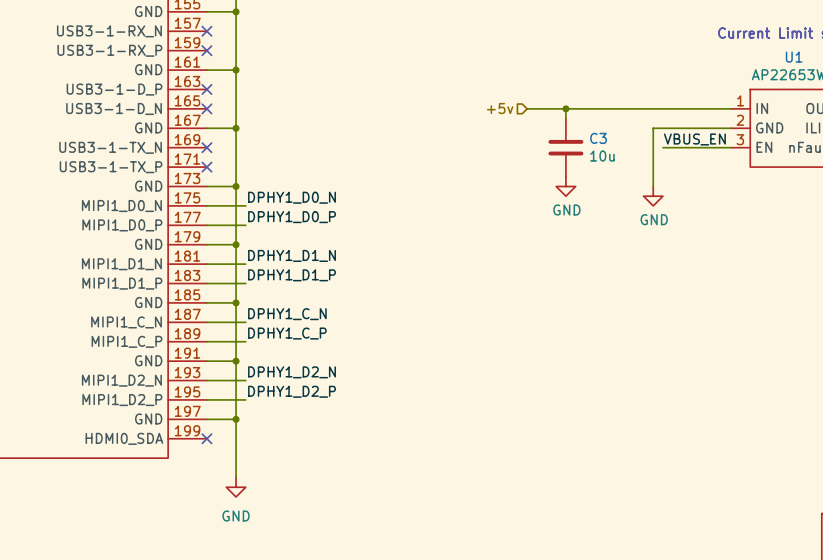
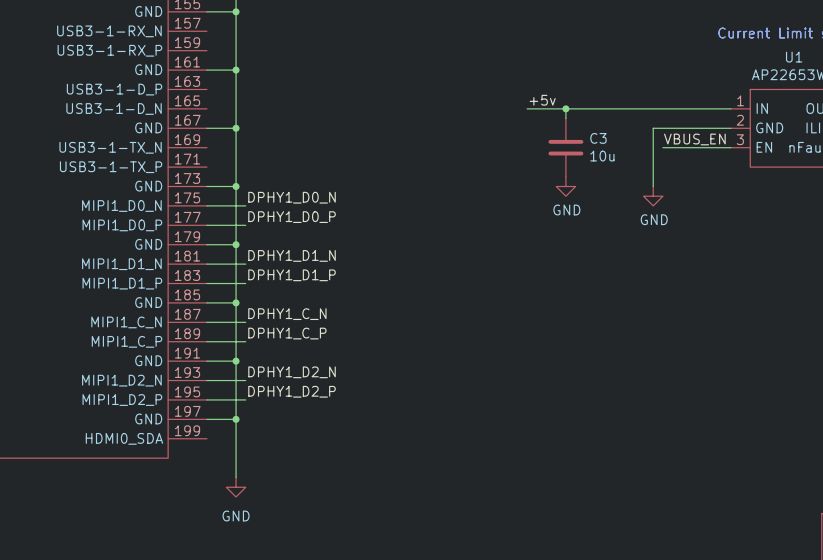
no-connect mark: (206, 31) -> none
no-connect mark: (206, 50) -> none
no-connect mark: (206, 89) -> none
label: none -> +5v (542, 100)
no-connect mark: (206, 108) -> none
hierarchical label: +5v (500, 108) -> none
no-connect mark: (206, 147) -> none
no-connect mark: (206, 167) -> none
no-connect mark: (206, 438) -> none

